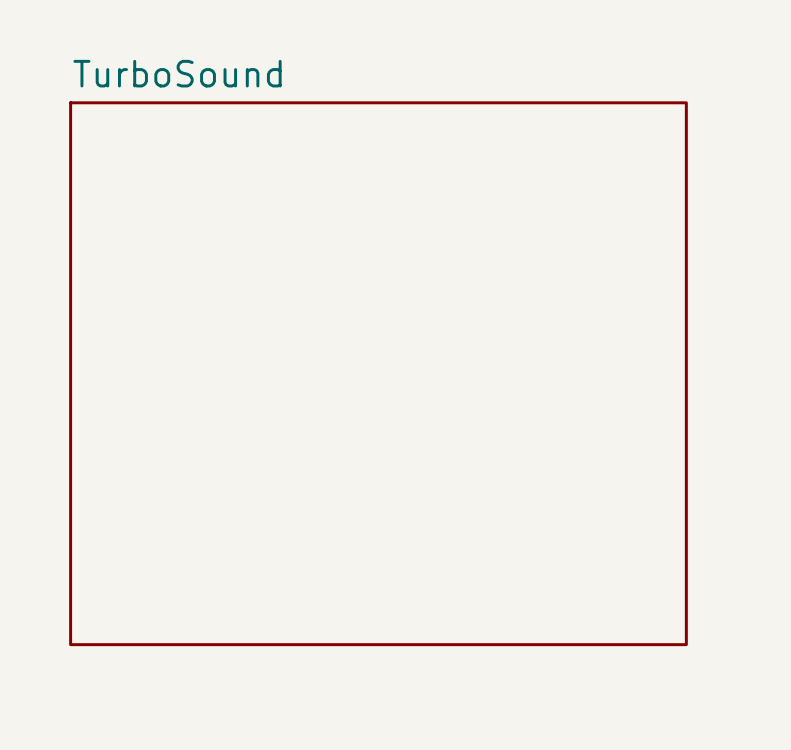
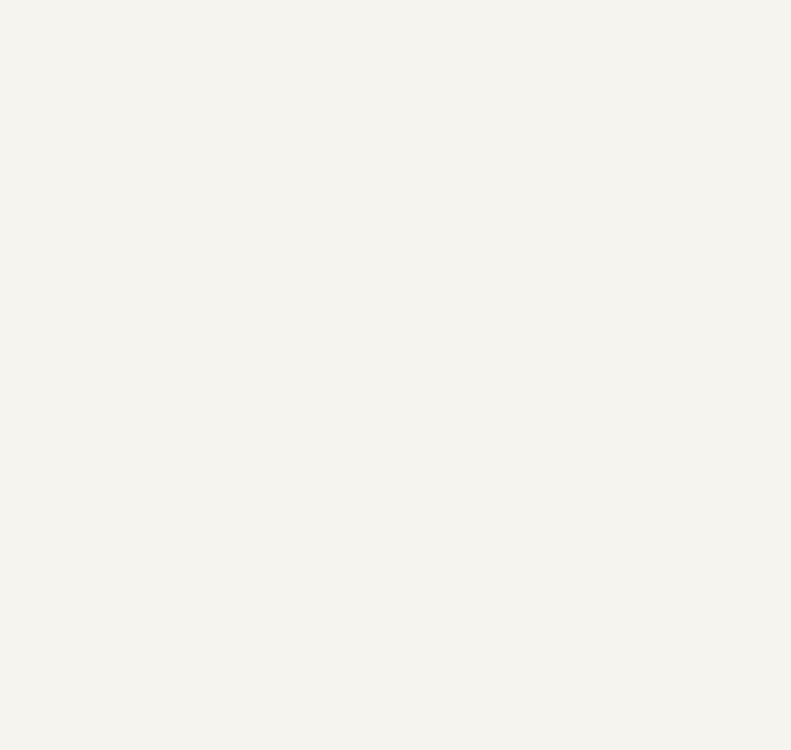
sheet TurboSound: (378, 373) -> none

